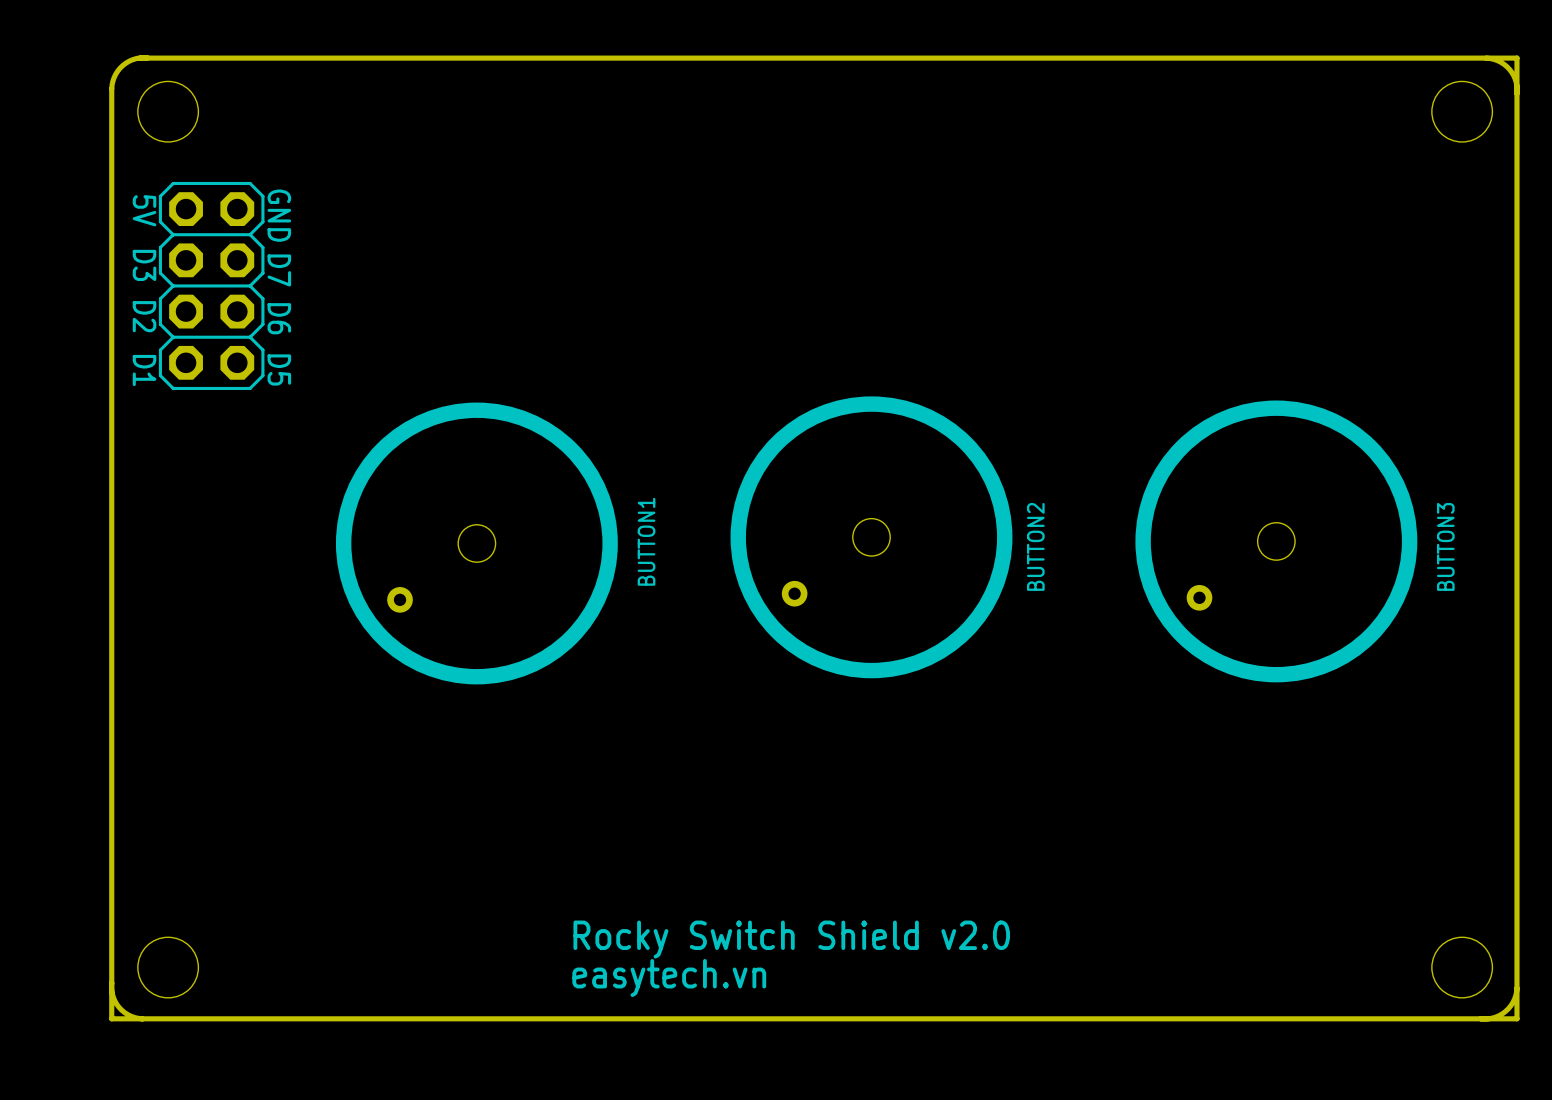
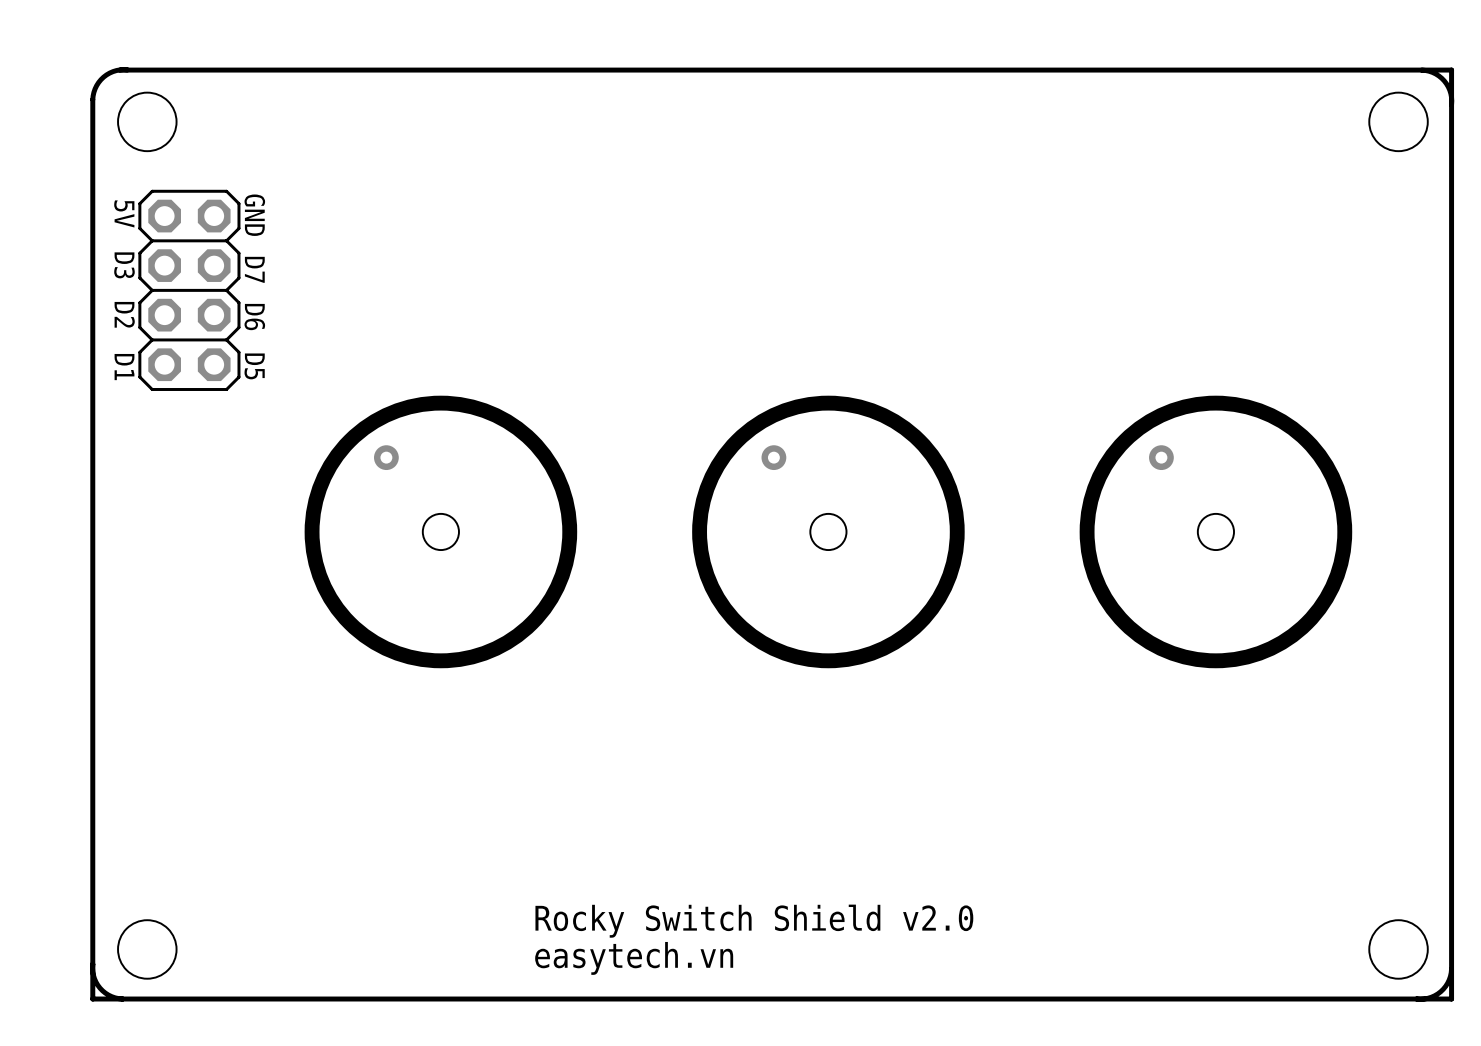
part: none -> (440, 531)
part: none -> (828, 531)
part: none -> (1215, 531)
BUTTON2: (871, 537) -> none
BUTTON3: (1276, 541) -> none
BUTTON1: (476, 543) -> none

